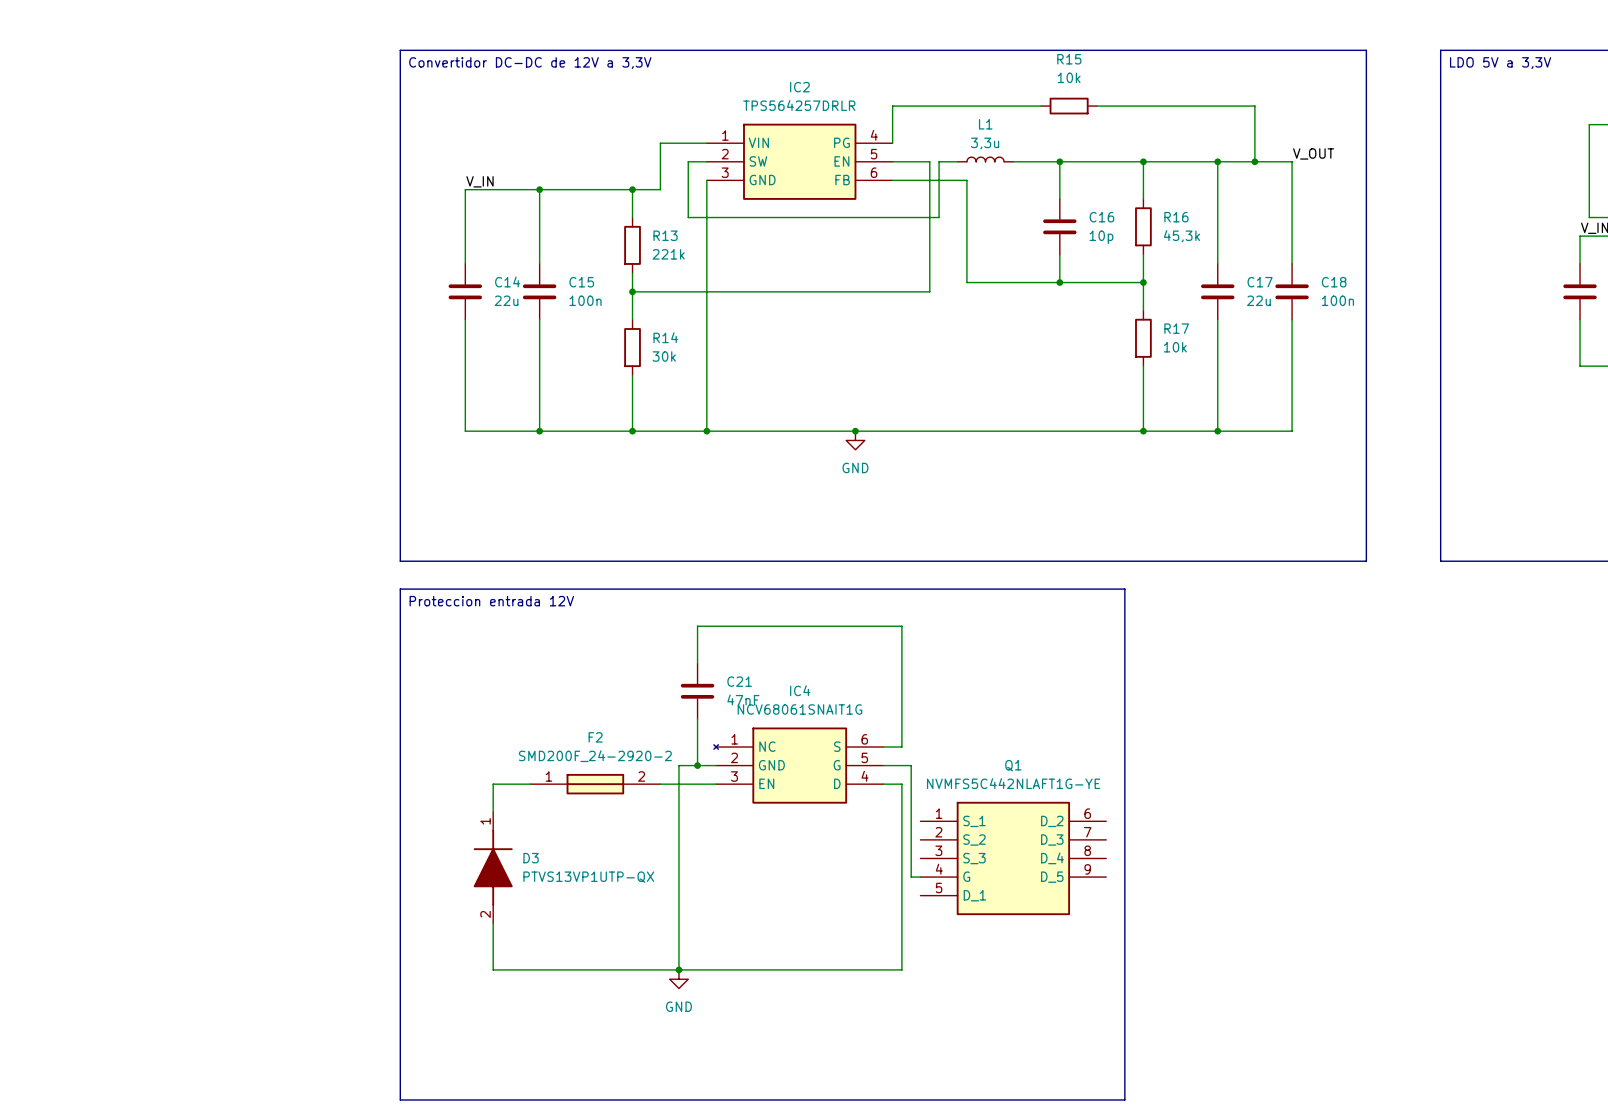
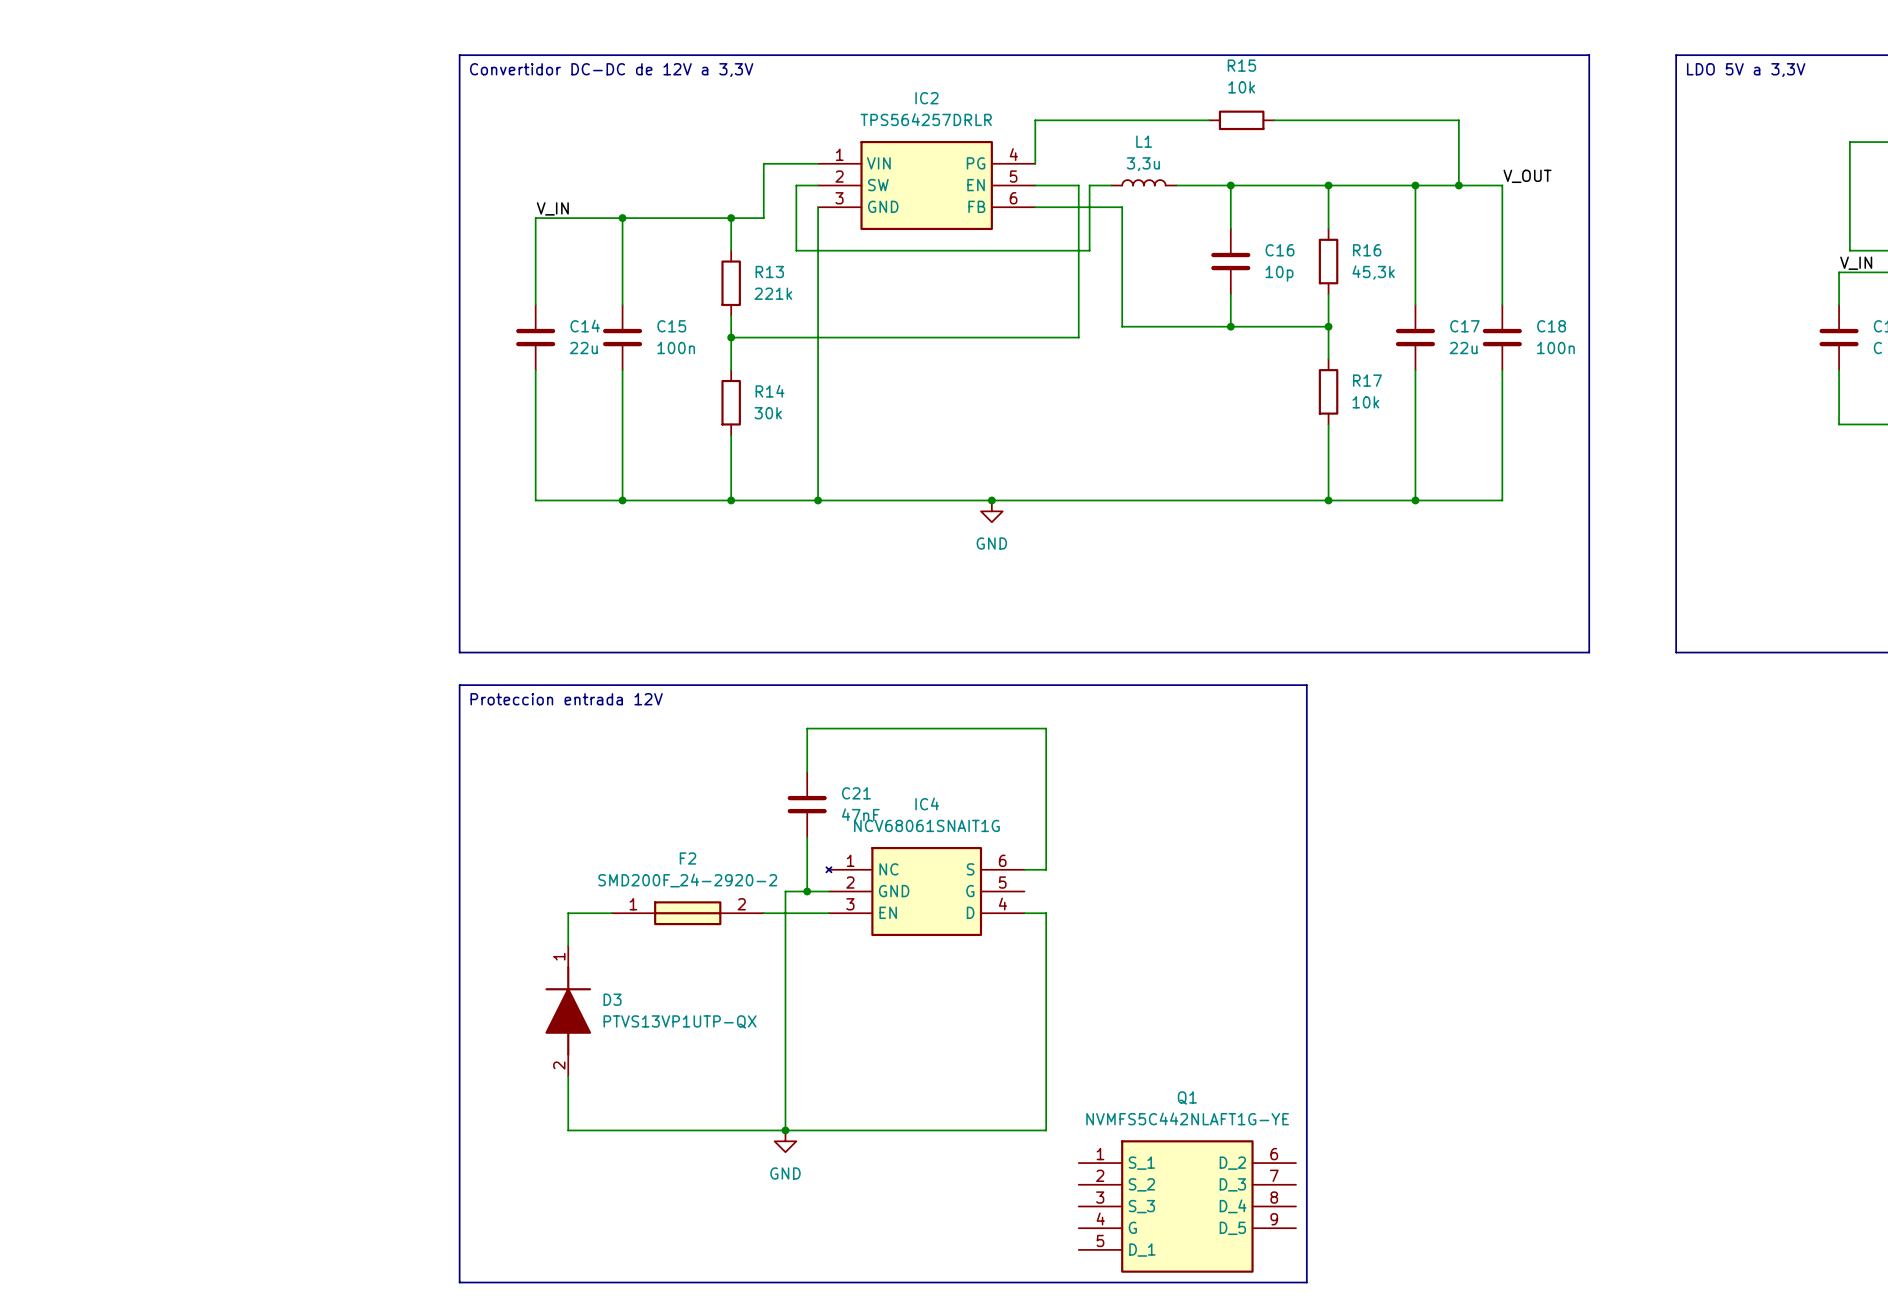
wire: (883, 765) (911, 765) (911, 877) (920, 877) -> none
Q1 position: (1013, 858) -> (1187, 1206)

